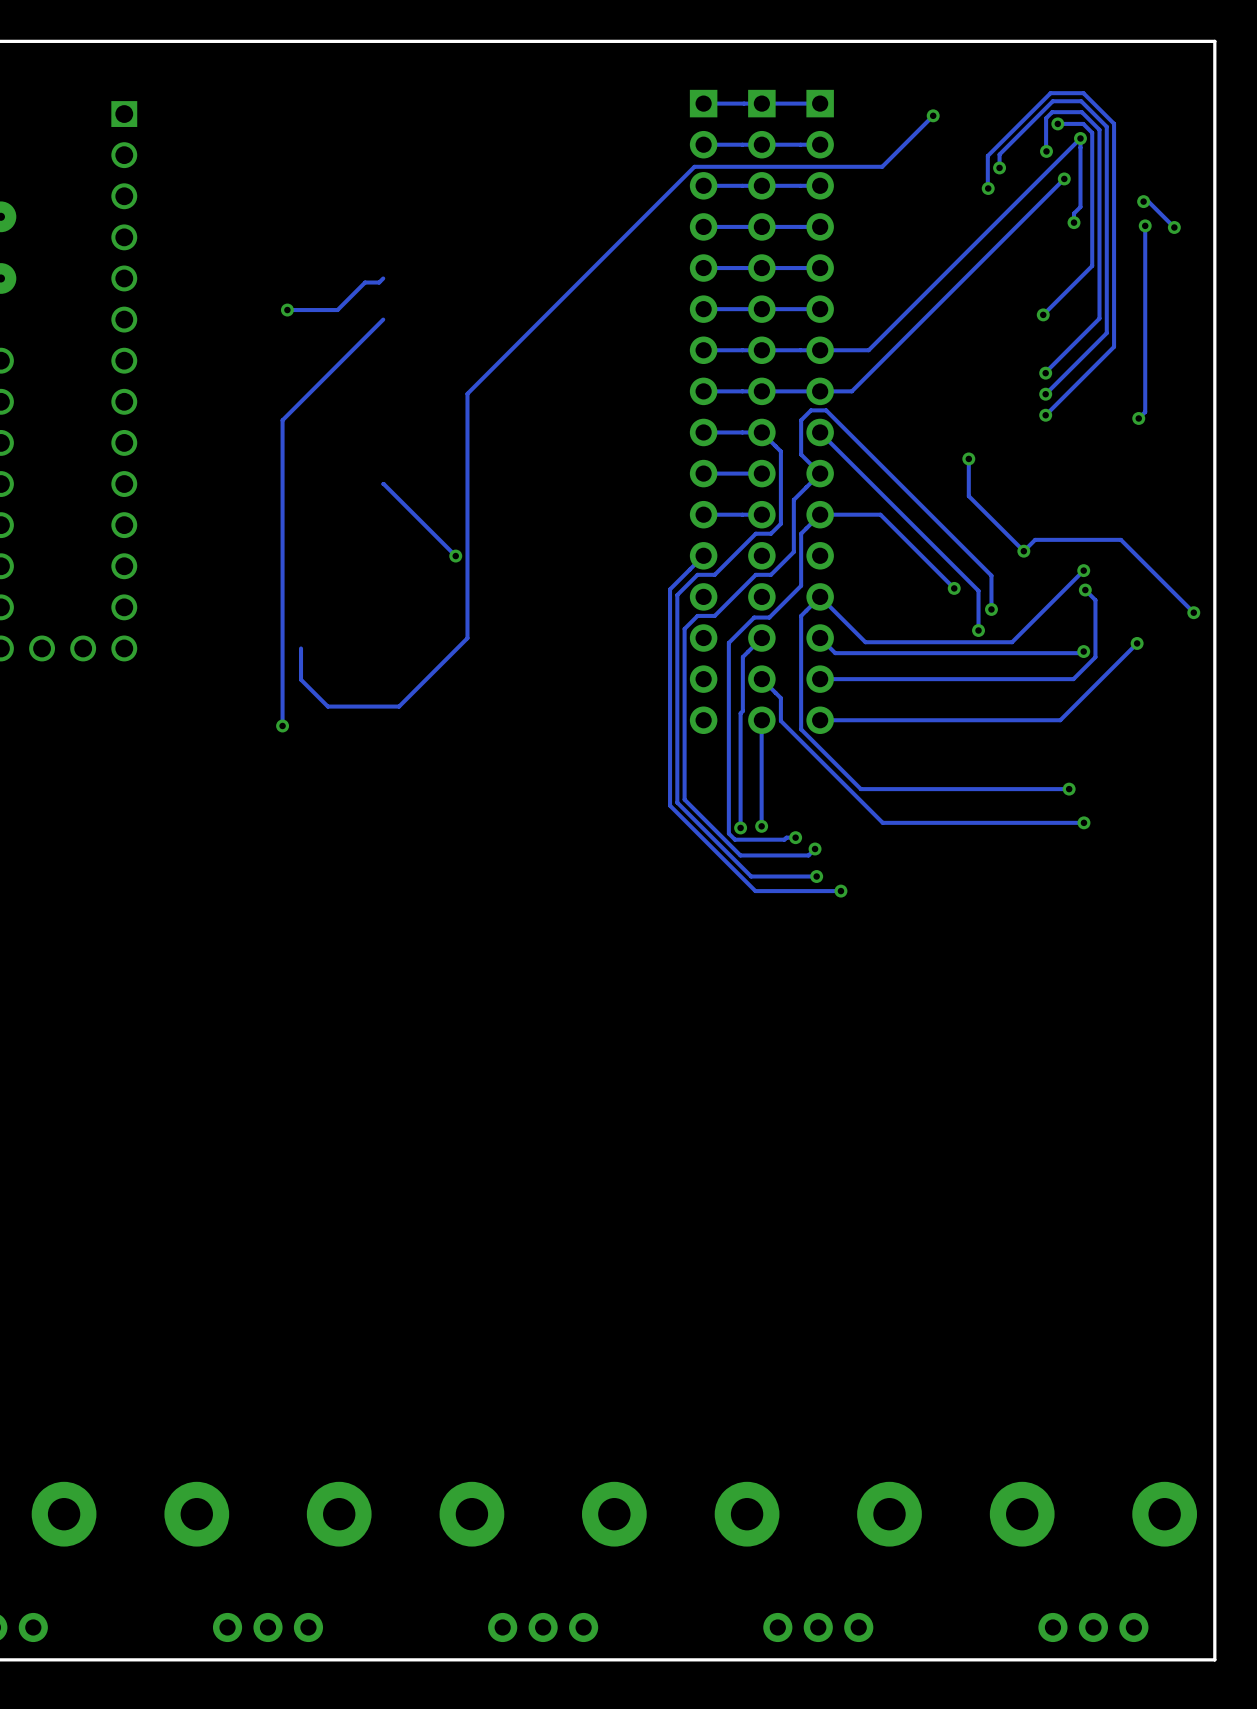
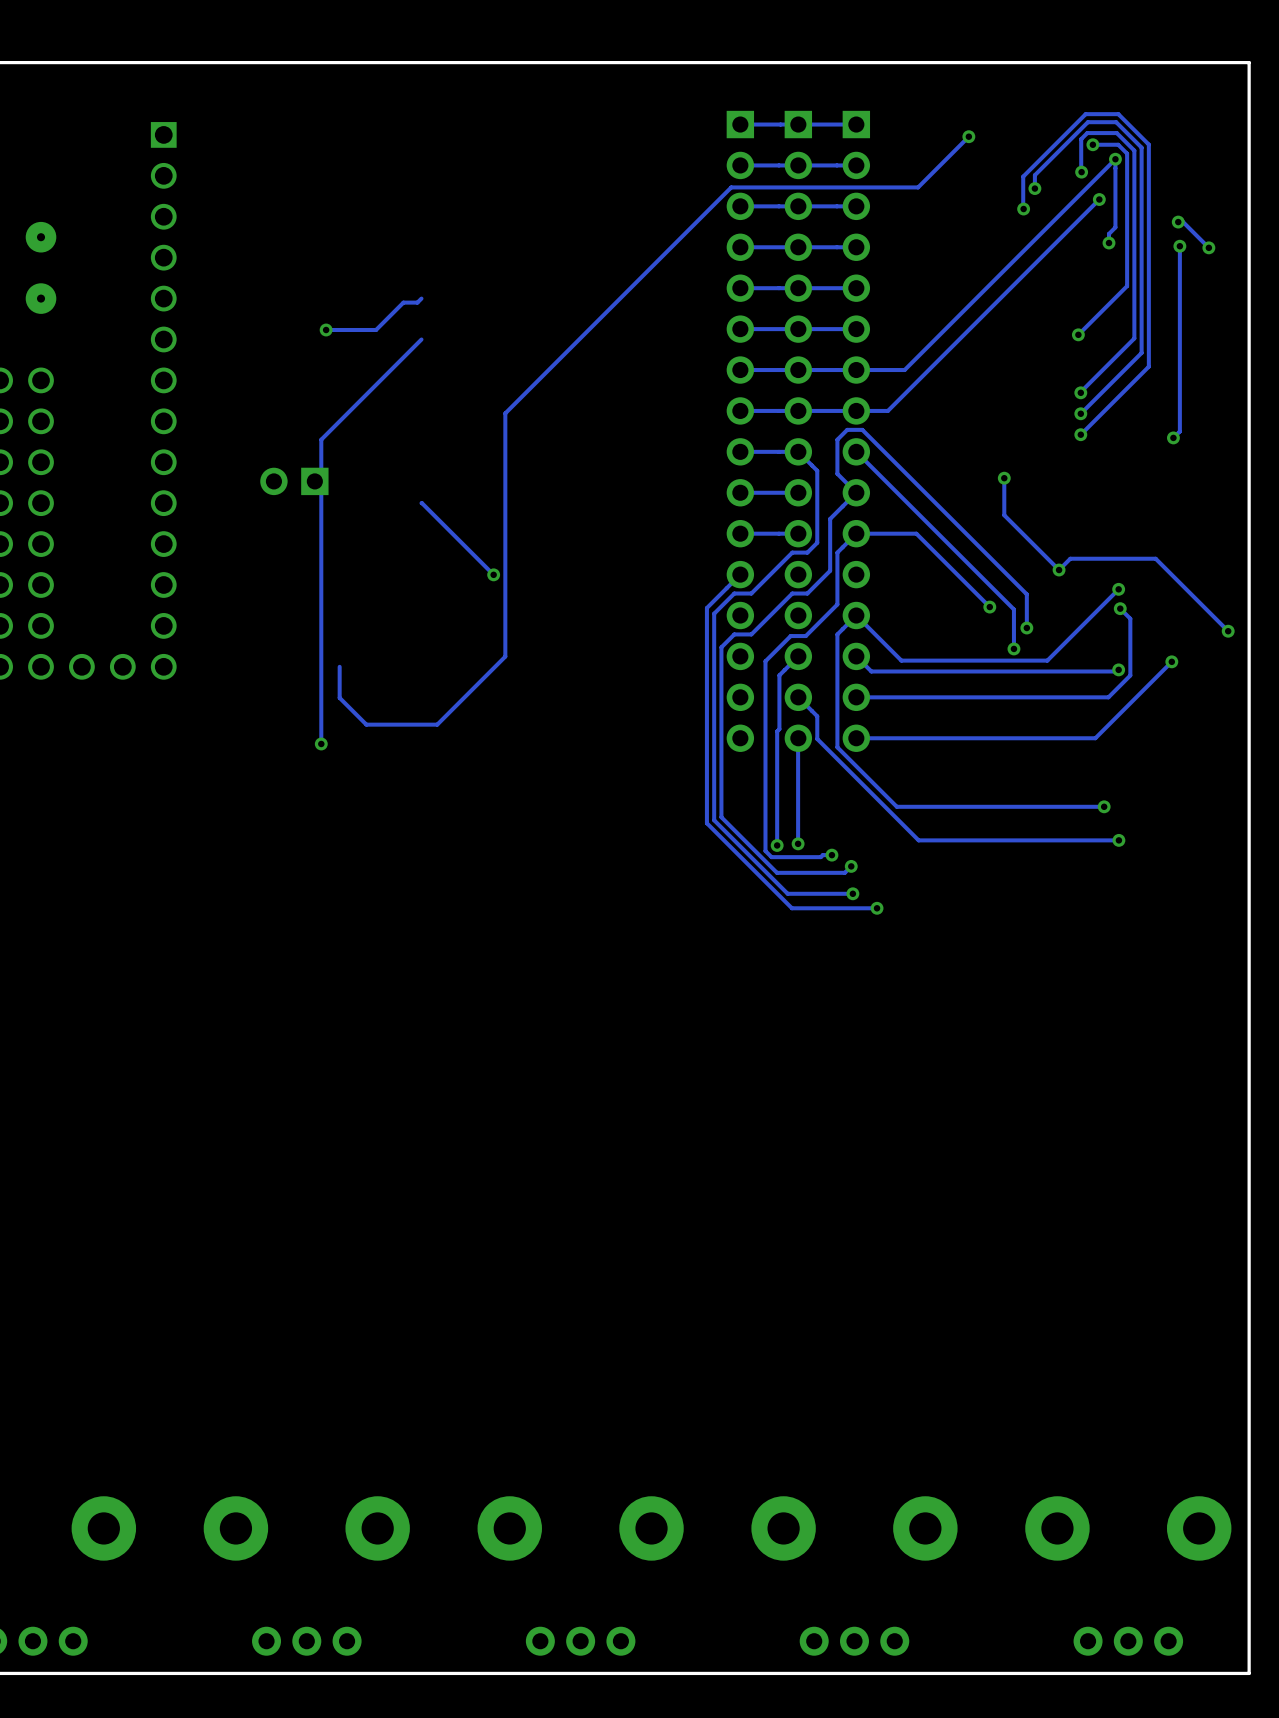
part: none -> (294, 481)

